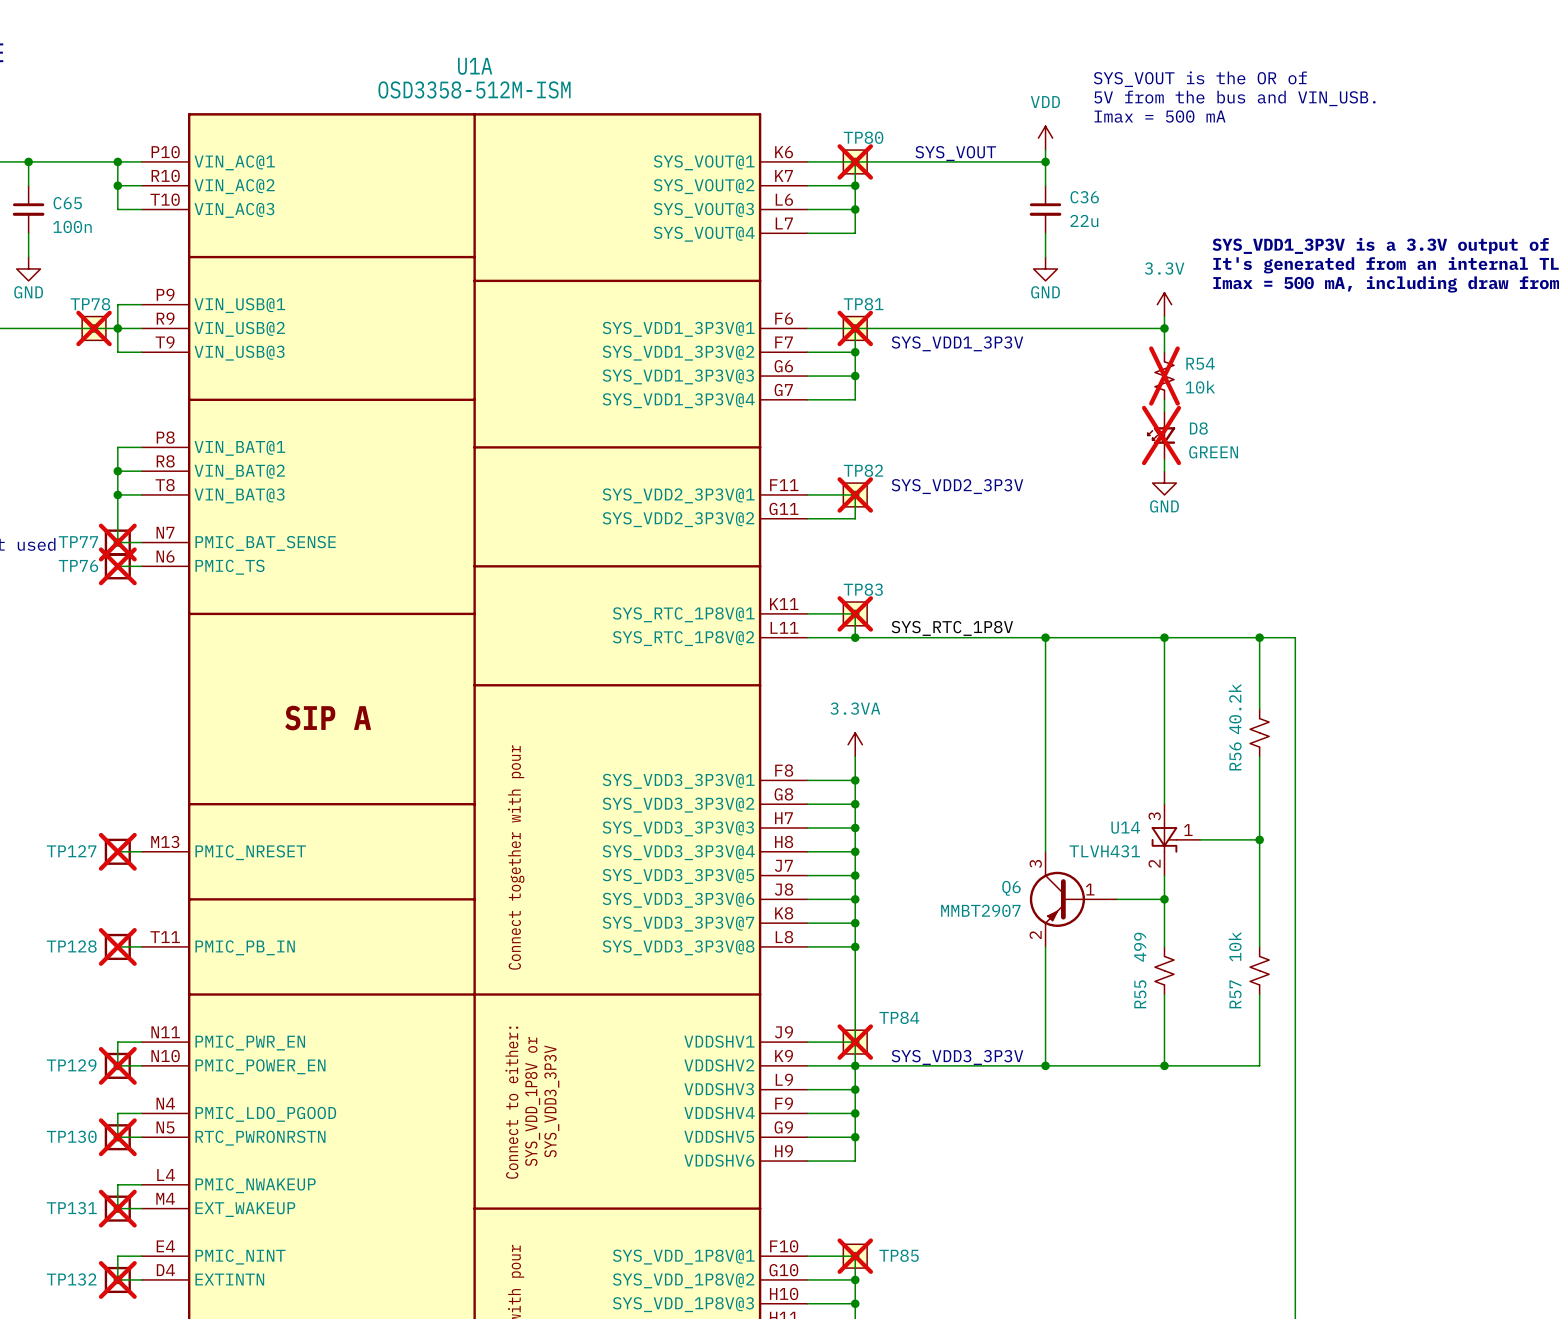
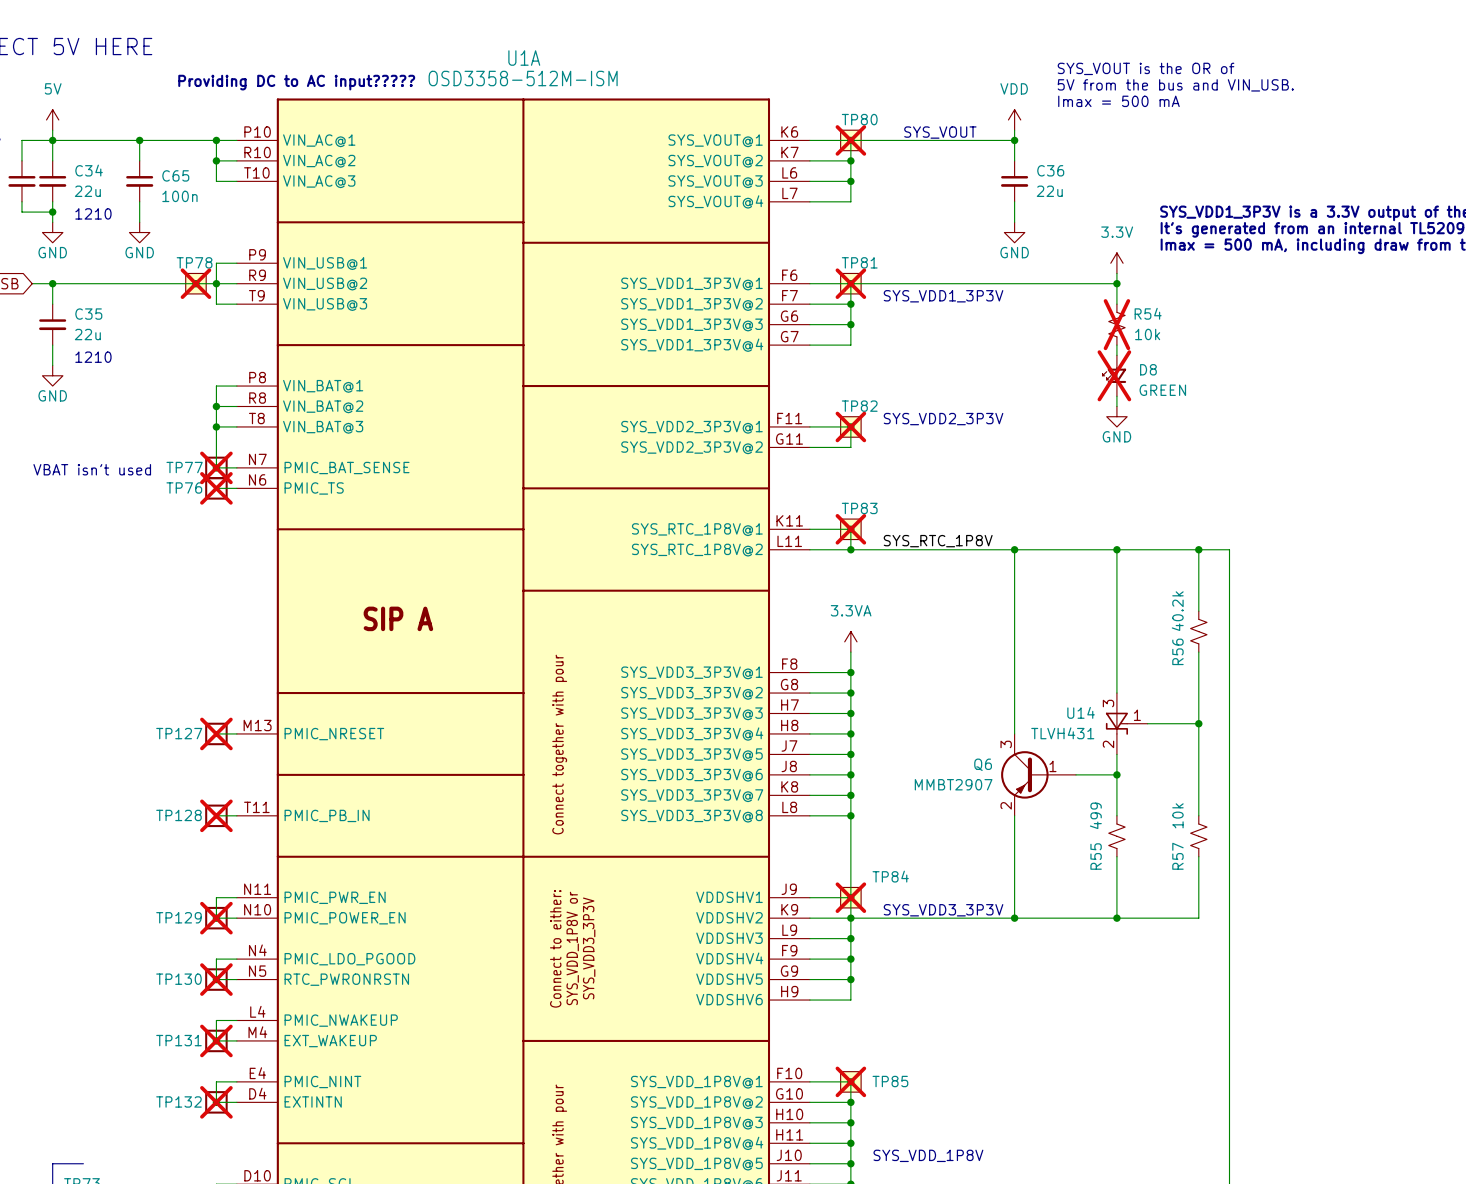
text: none -> Providing DC to AC input????? (296, 82)

